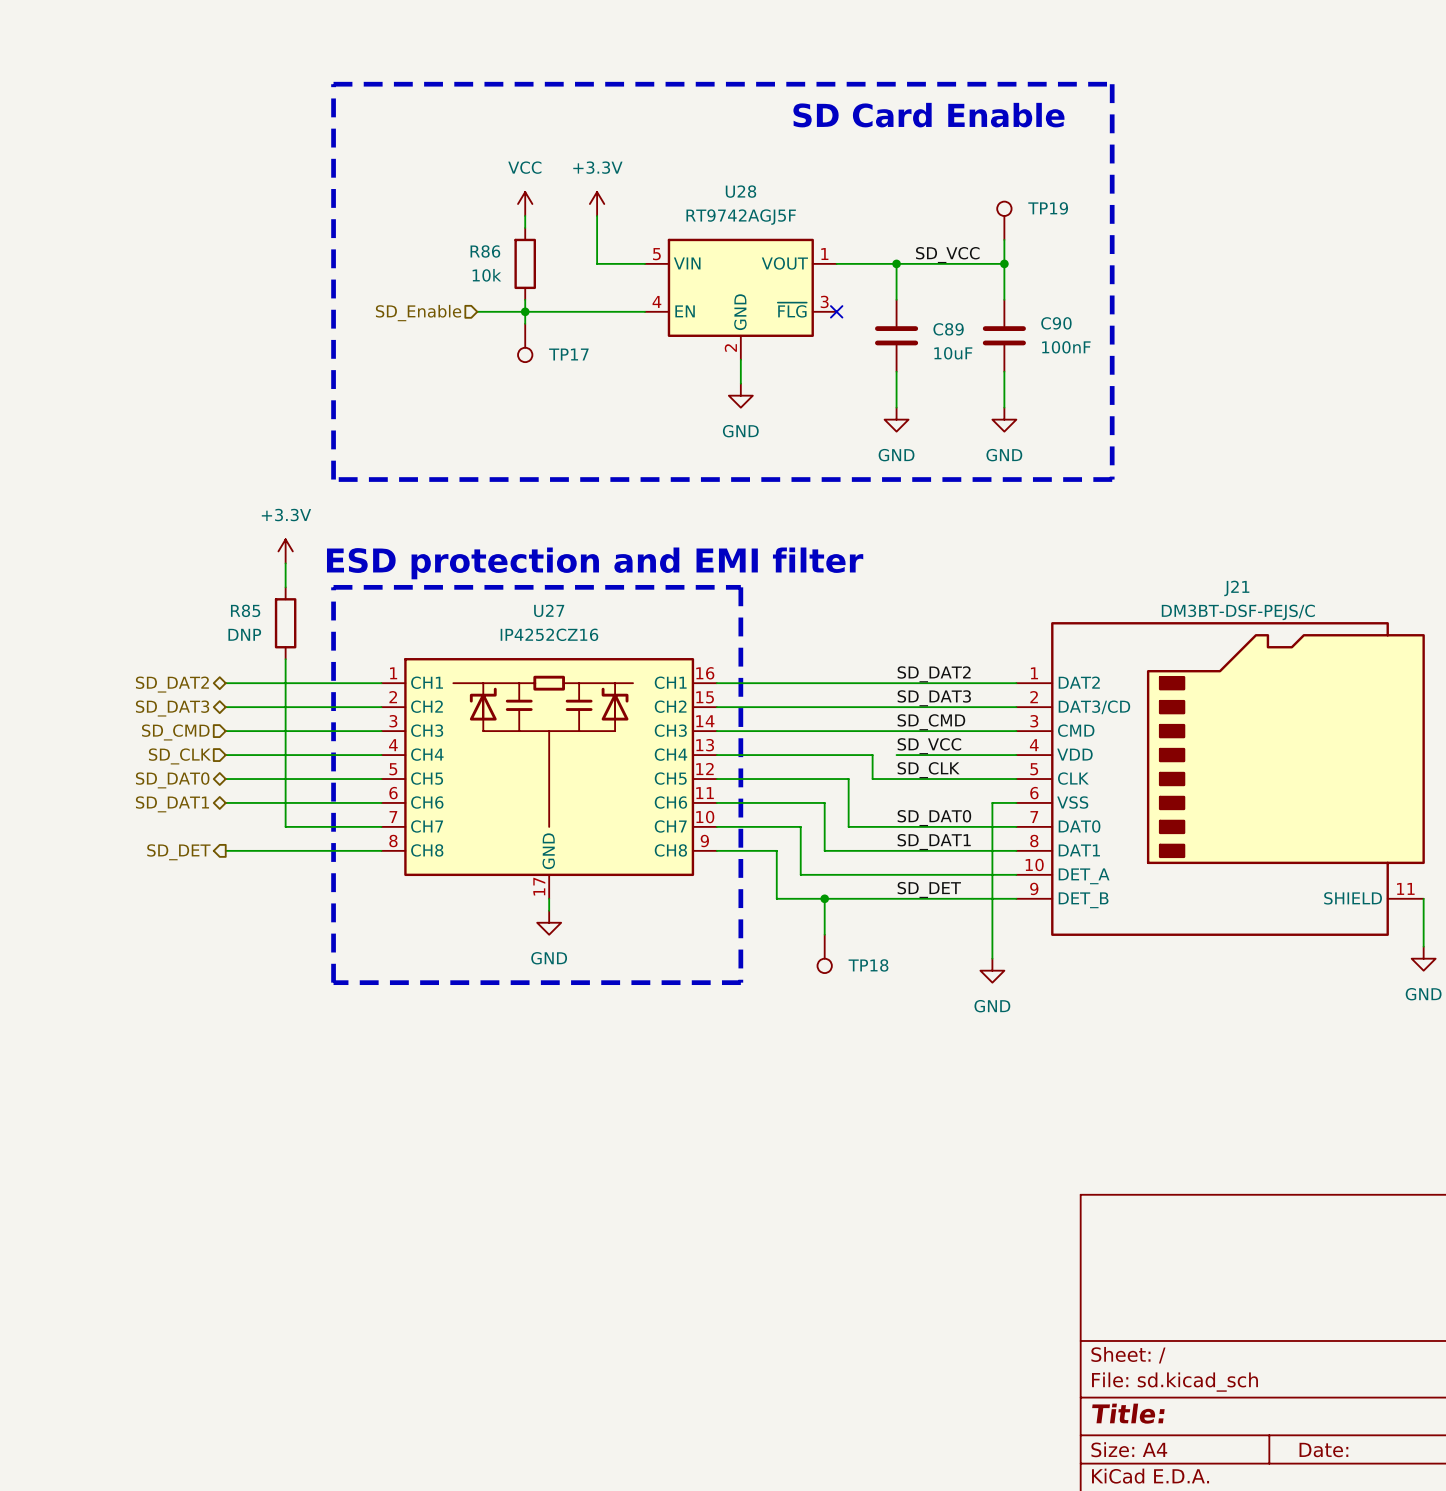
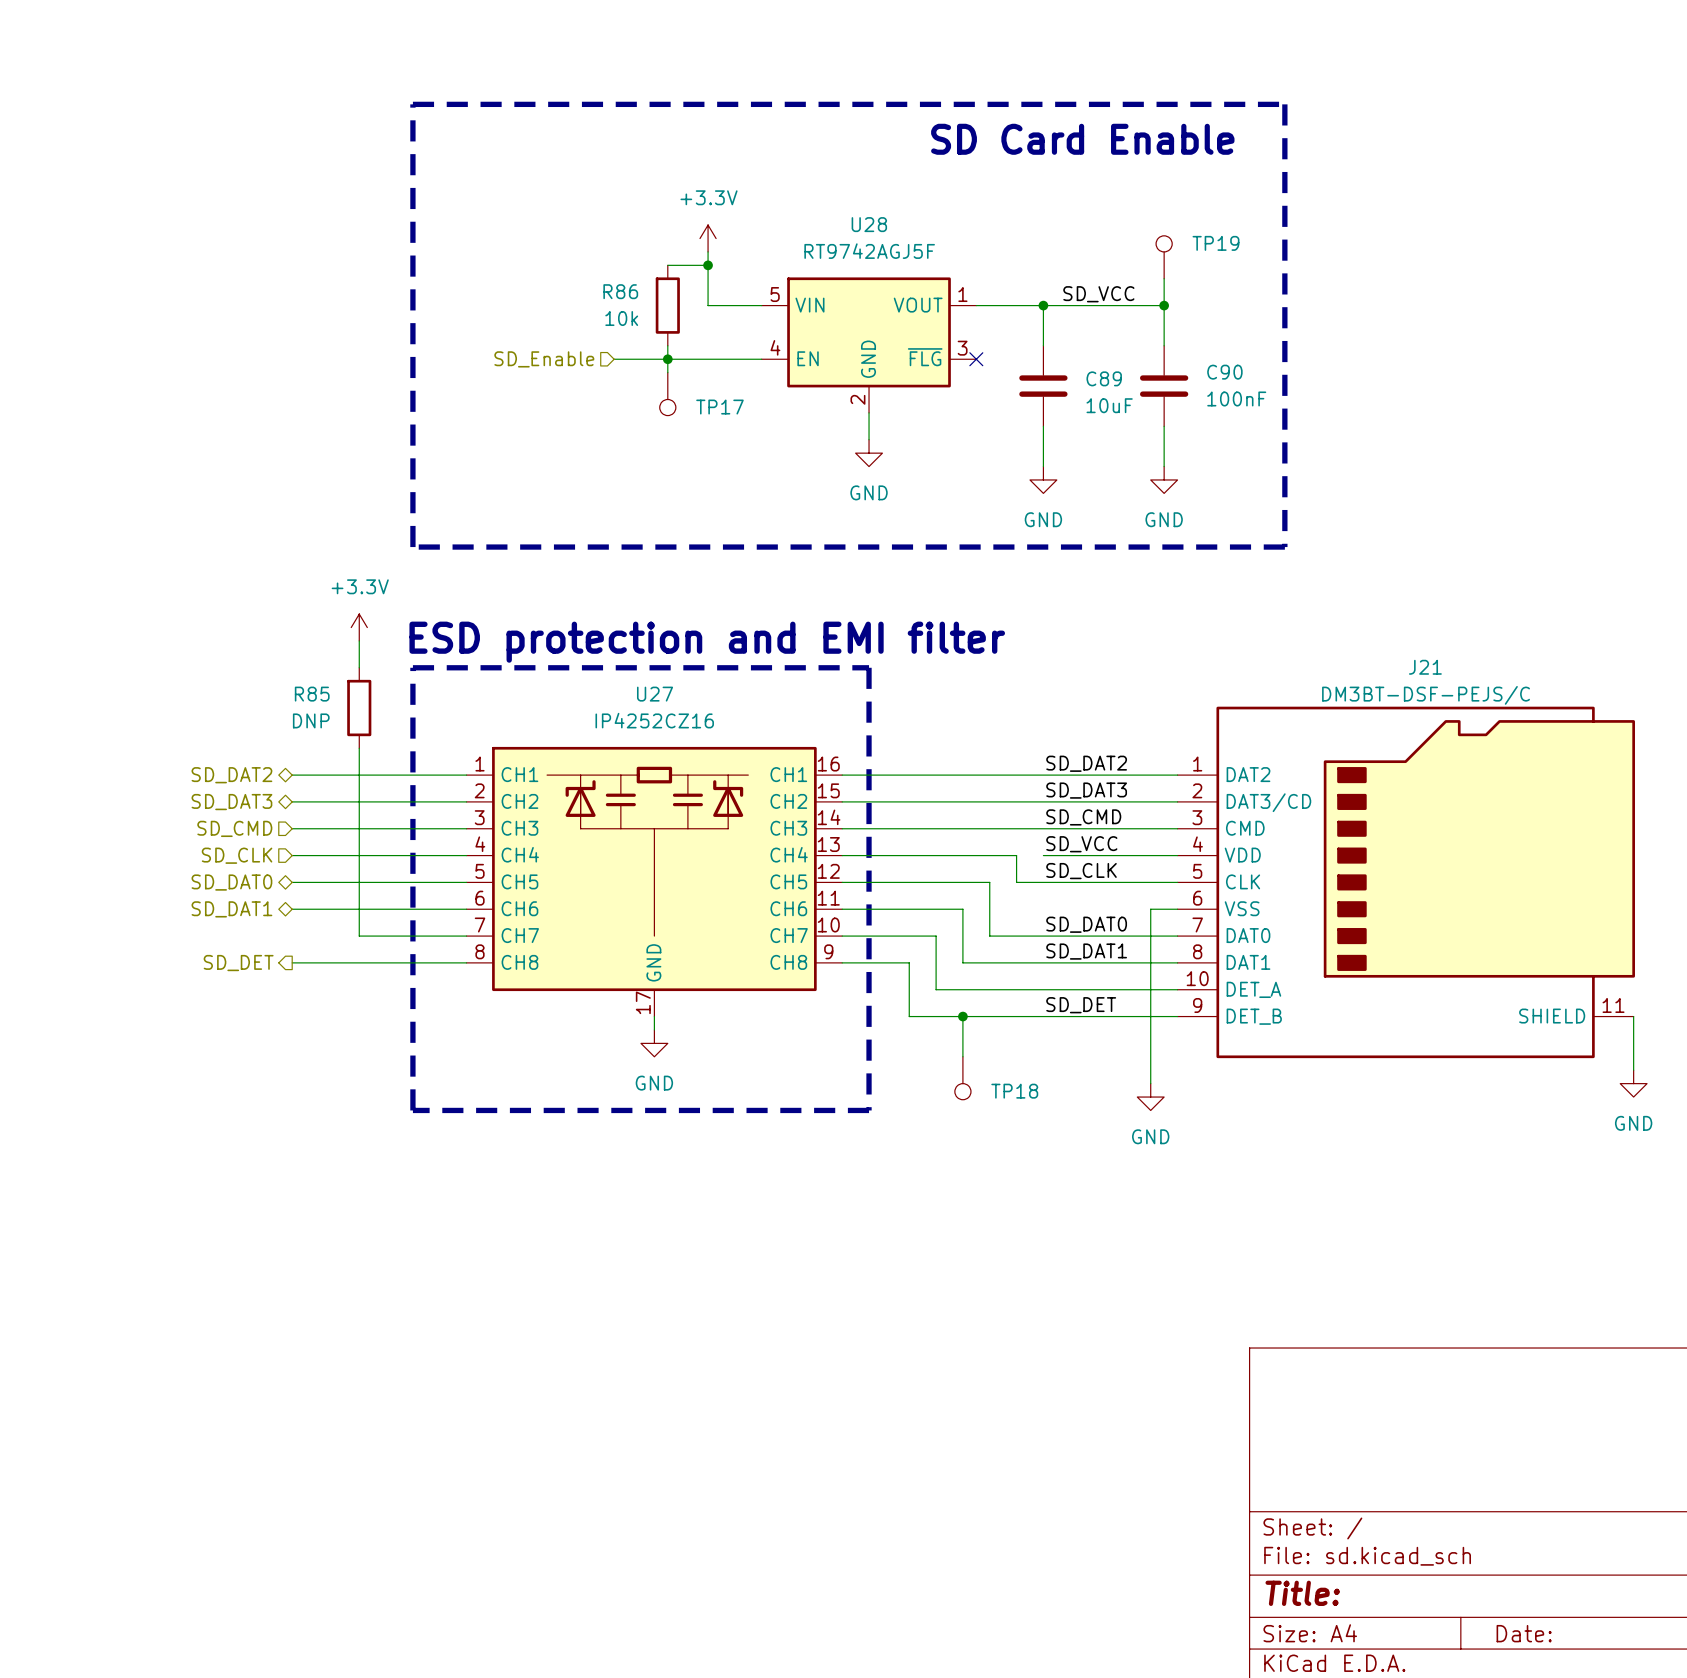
power symbol: VCC (525, 204) -> none
wire: (525, 215) (525, 227) -> none
junction: none -> (708, 265)
R86 position: (525, 263) -> (667, 305)
wire: (525, 299) (525, 323) -> (667, 345) (667, 372)
wire: (477, 311) (513, 311) -> (667, 265) (708, 265)
junction position: (525, 311) -> (667, 359)
hierarchical label position: SD_Enable (418, 313) -> SD_Enable (544, 359)
TP17 position: (525, 342) -> (667, 394)

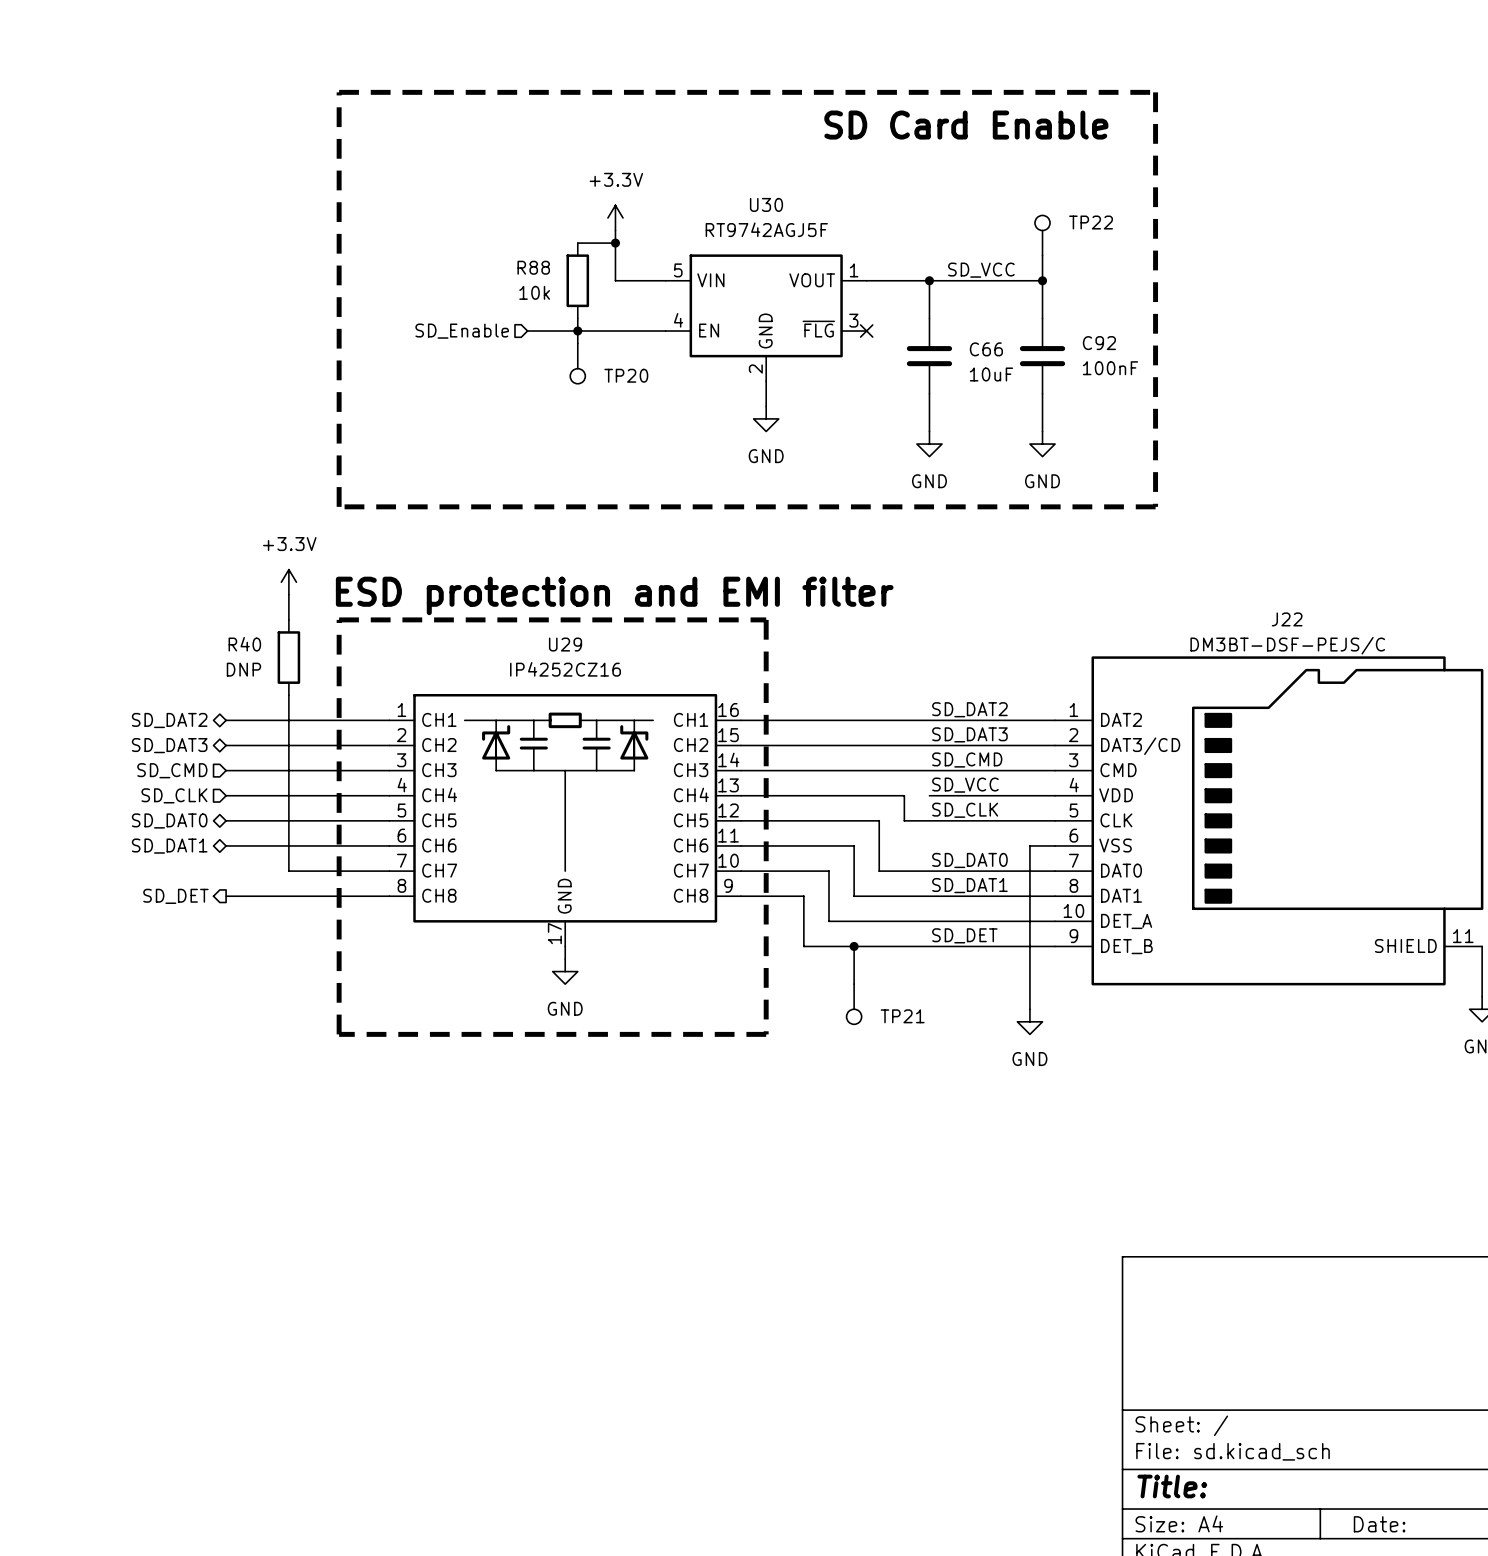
U28 name: U28 (869, 224) -> U30 (766, 204)
TP19 name: TP19 (1215, 243) -> TP22 (1091, 222)
R86 name: R86 (620, 291) -> R88 (533, 267)
C90 name: C90 (1224, 372) -> C92 (1099, 343)
C89 name: C89 (1104, 378) -> C66 (986, 349)
TP17 name: TP17 (719, 407) -> TP20 (626, 375)
J21 name: J21 (1425, 667) -> J22 (1287, 619)
R85 name: R85 (312, 694) -> R40 (244, 644)
U27 name: U27 (655, 694) -> U29 (565, 644)
TP18 name: TP18 (1014, 1091) -> TP21 (902, 1016)

